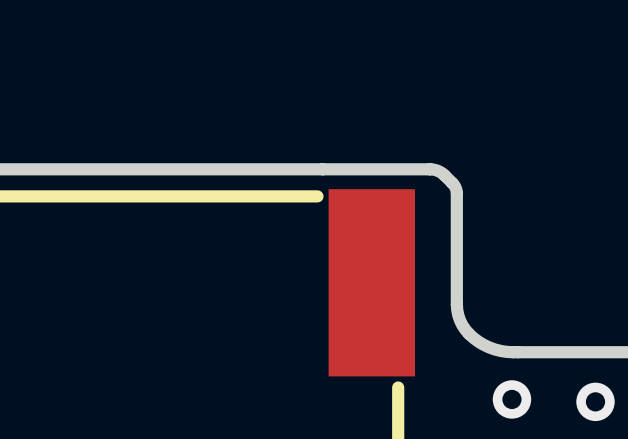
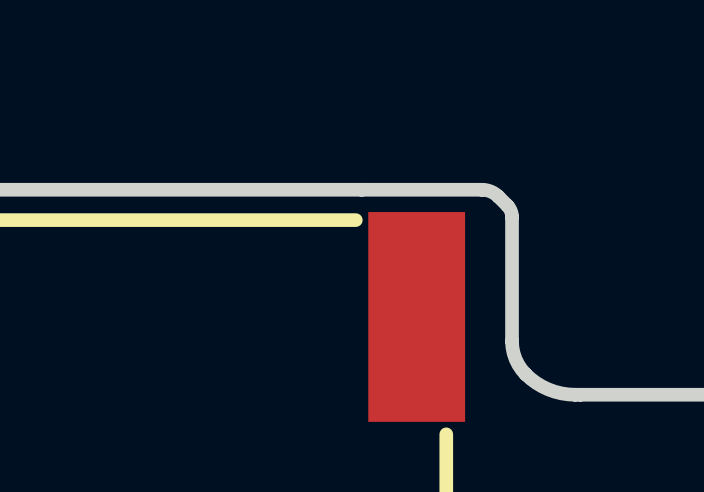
via: (511, 399) -> none
via: (595, 401) -> none

